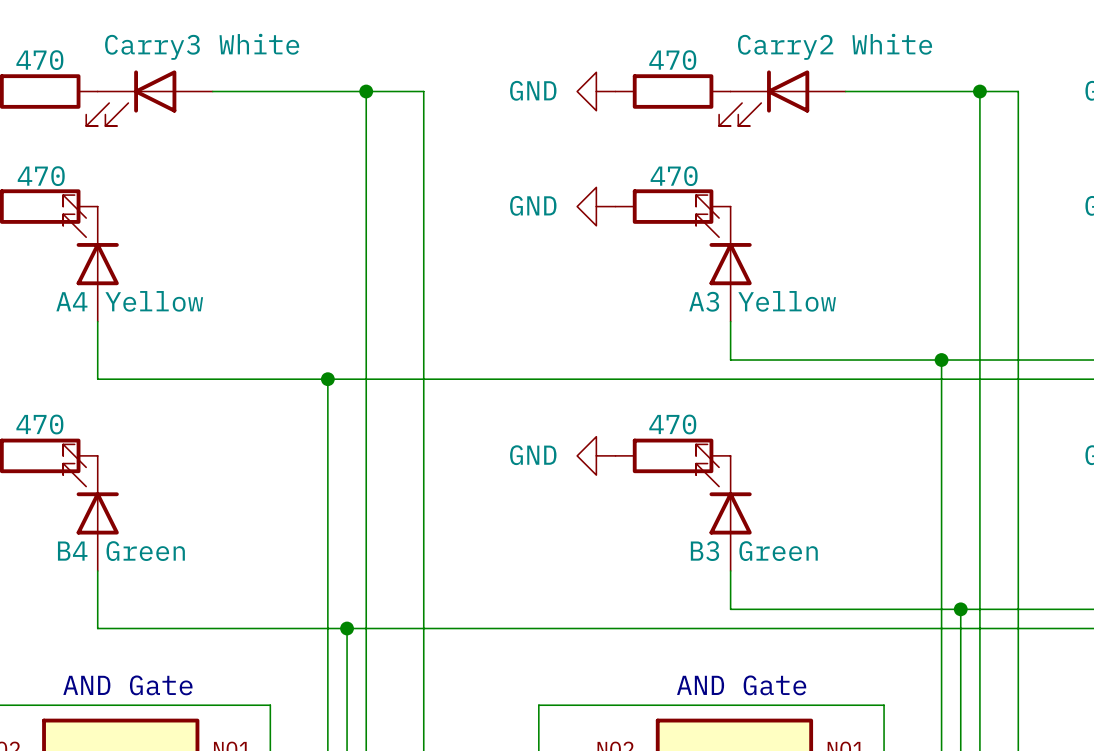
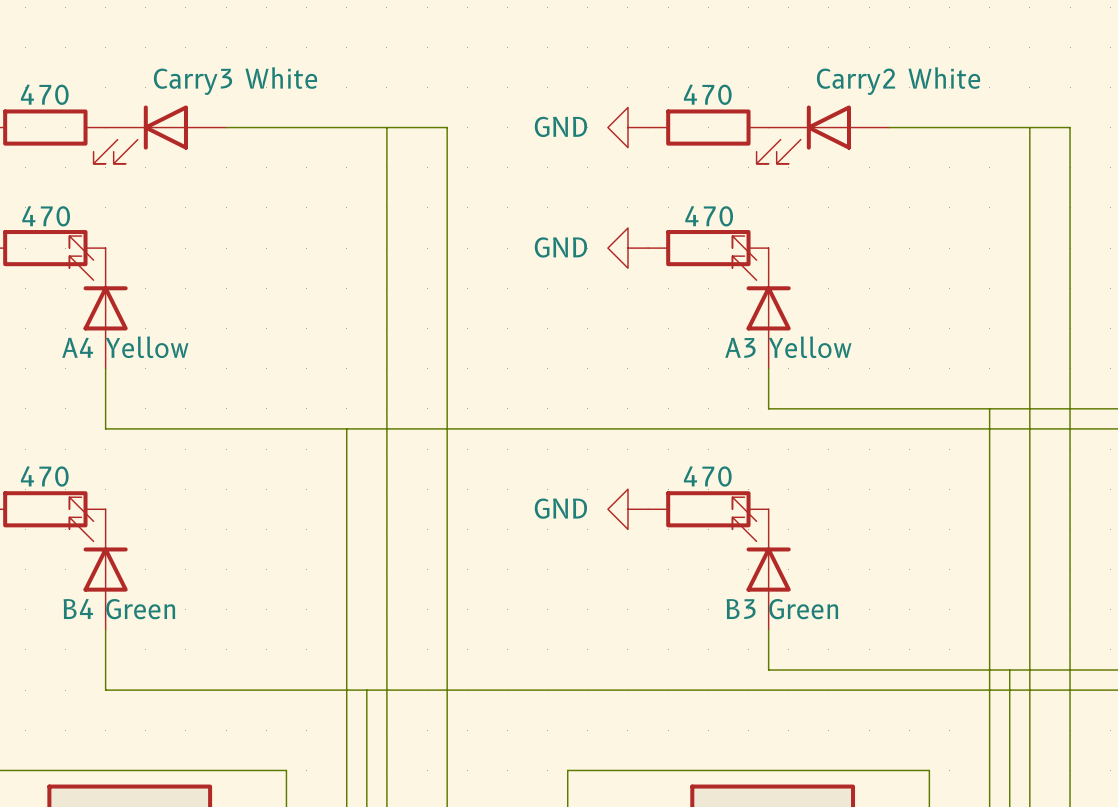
junction: (366, 91) -> none
junction: (979, 91) -> none
junction: (941, 360) -> none
junction: (327, 379) -> none
junction: (960, 609) -> none
junction: (347, 628) -> none
text: AND Gate (127, 685) -> none
text: AND Gate (741, 685) -> none

